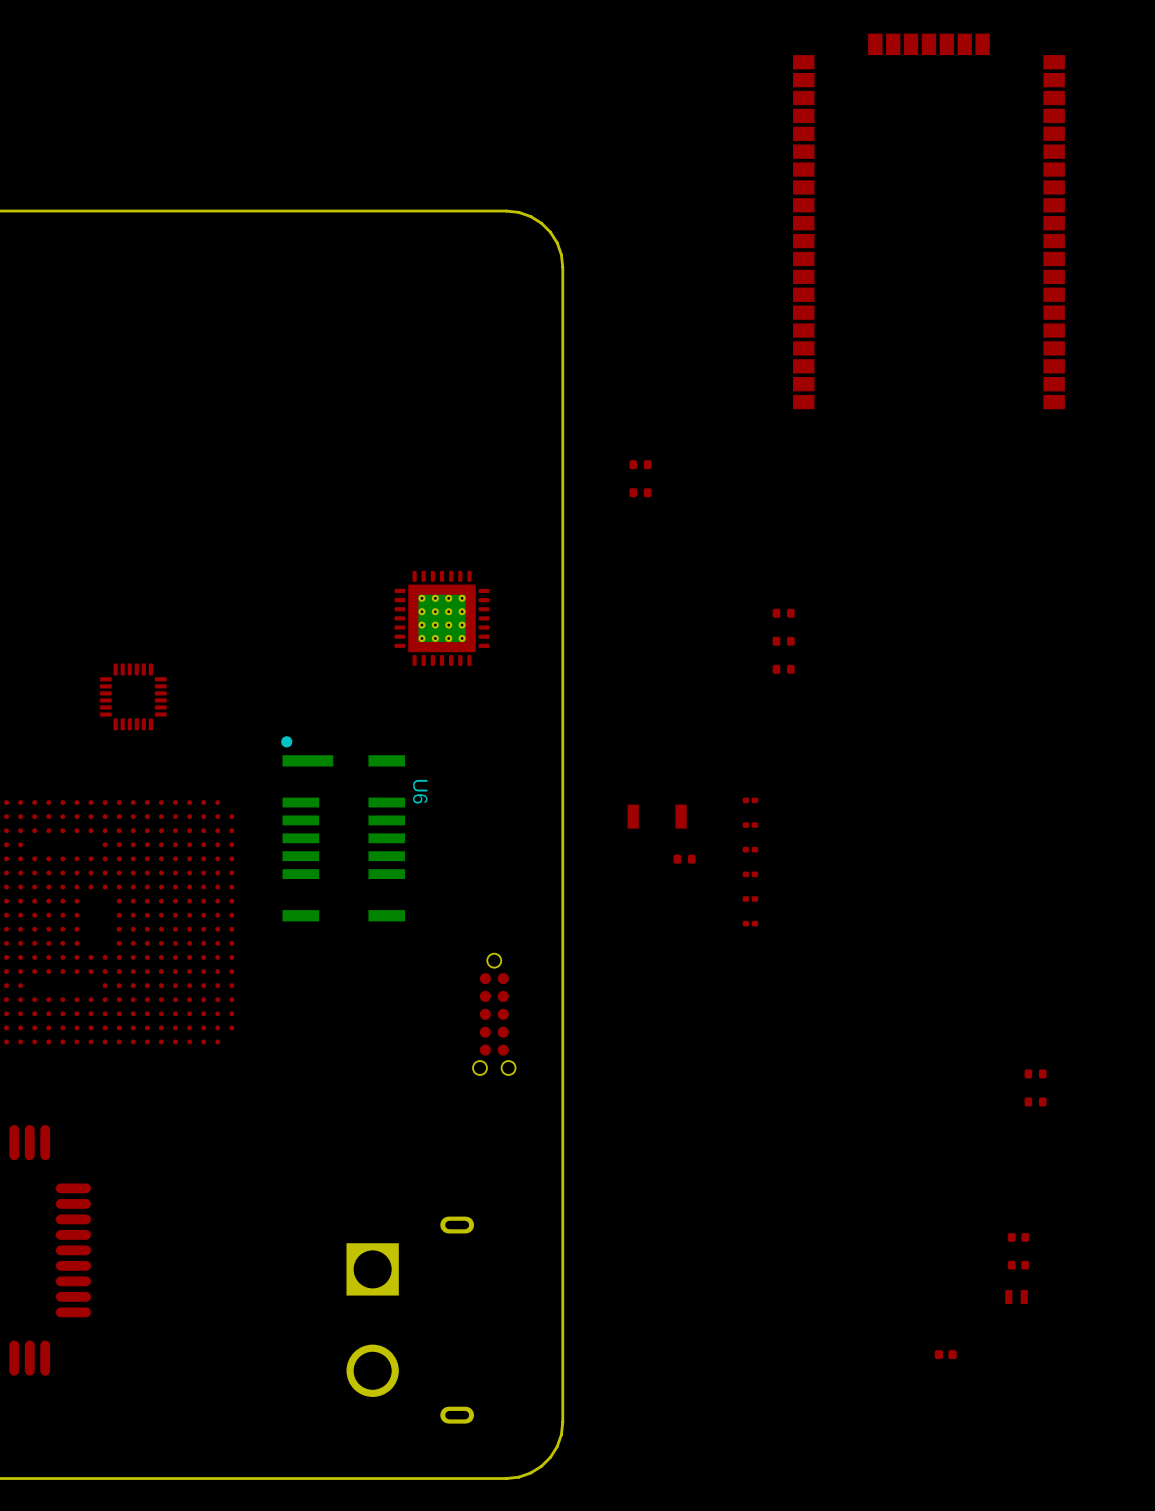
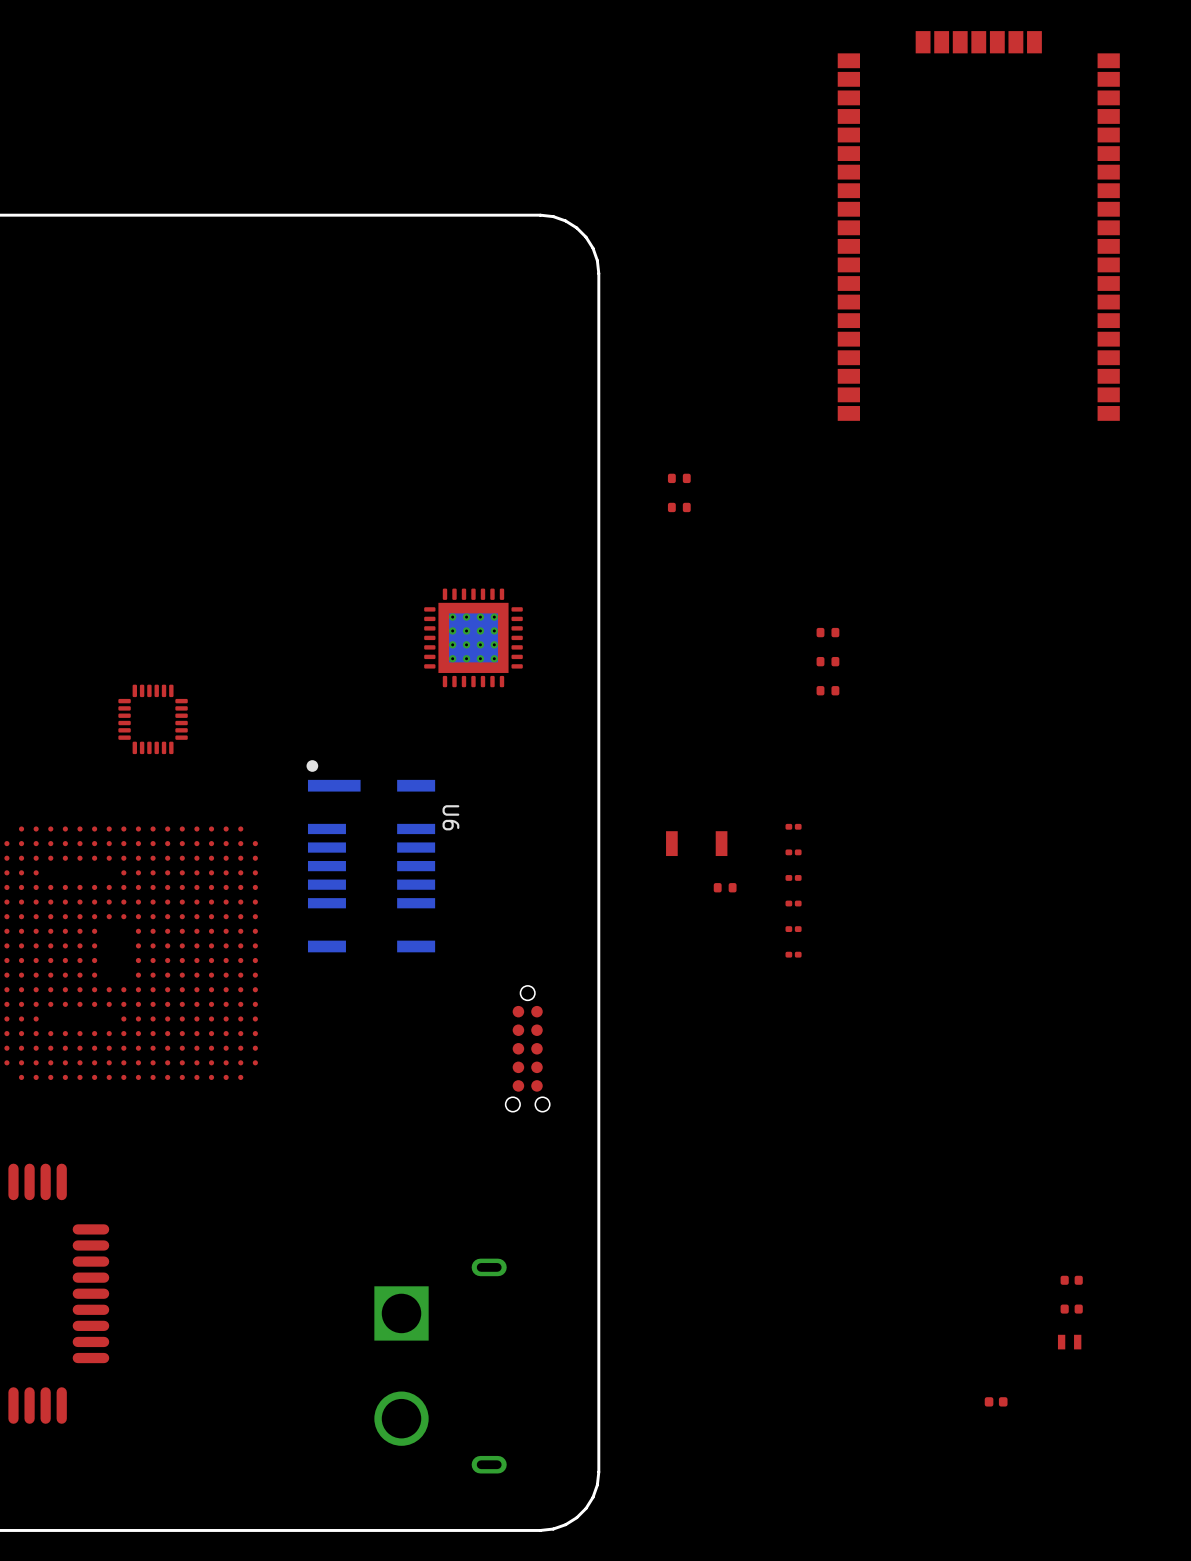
part: (1035, 1073) -> none
part: (1035, 1101) -> none

